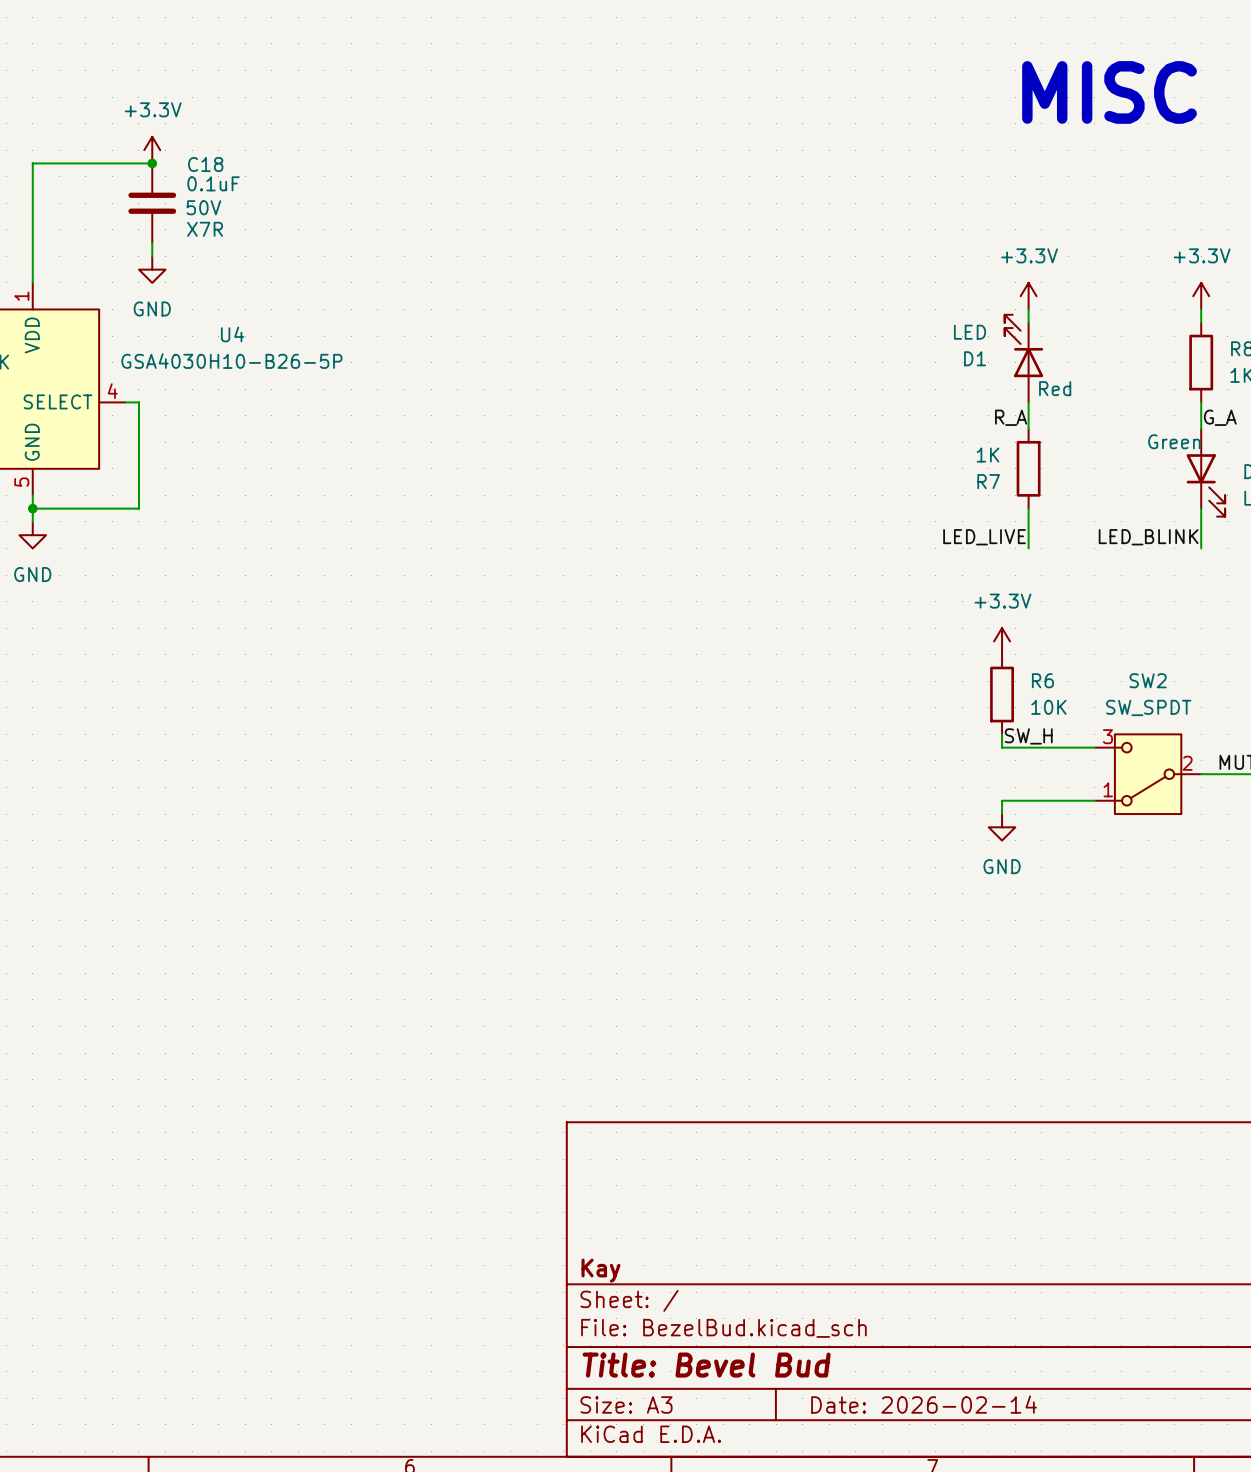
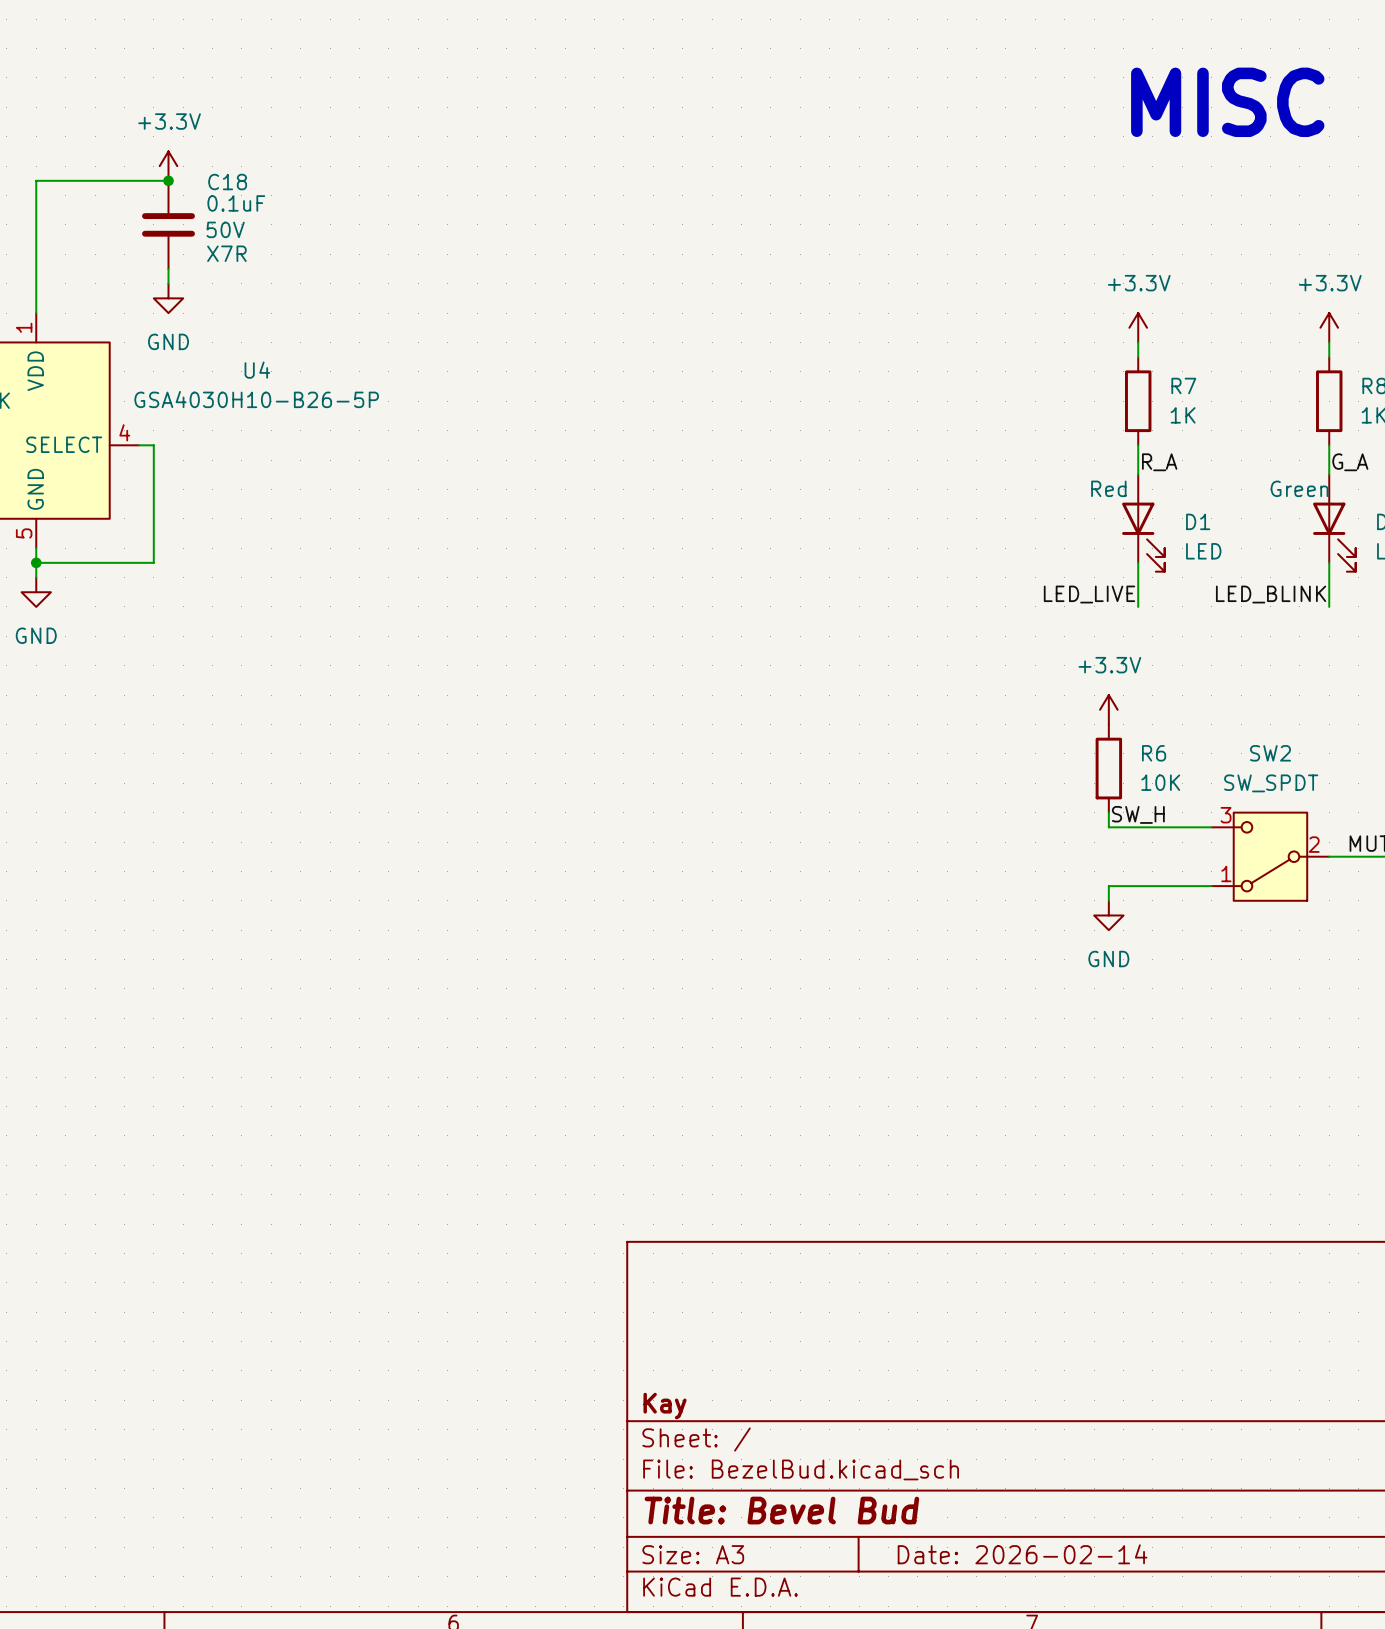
D1 rotation: 0° (1023, 345) -> 180° (1143, 537)
D1 position: (1023, 358) -> (1143, 523)
label position: R_A (1011, 417) -> R_A (1159, 462)
R7 value position: 1K (988, 455) -> 1K (1183, 415)
R7 position: (1028, 468) -> (1138, 401)
R7 name position: R7 (988, 481) -> R7 (1183, 385)

